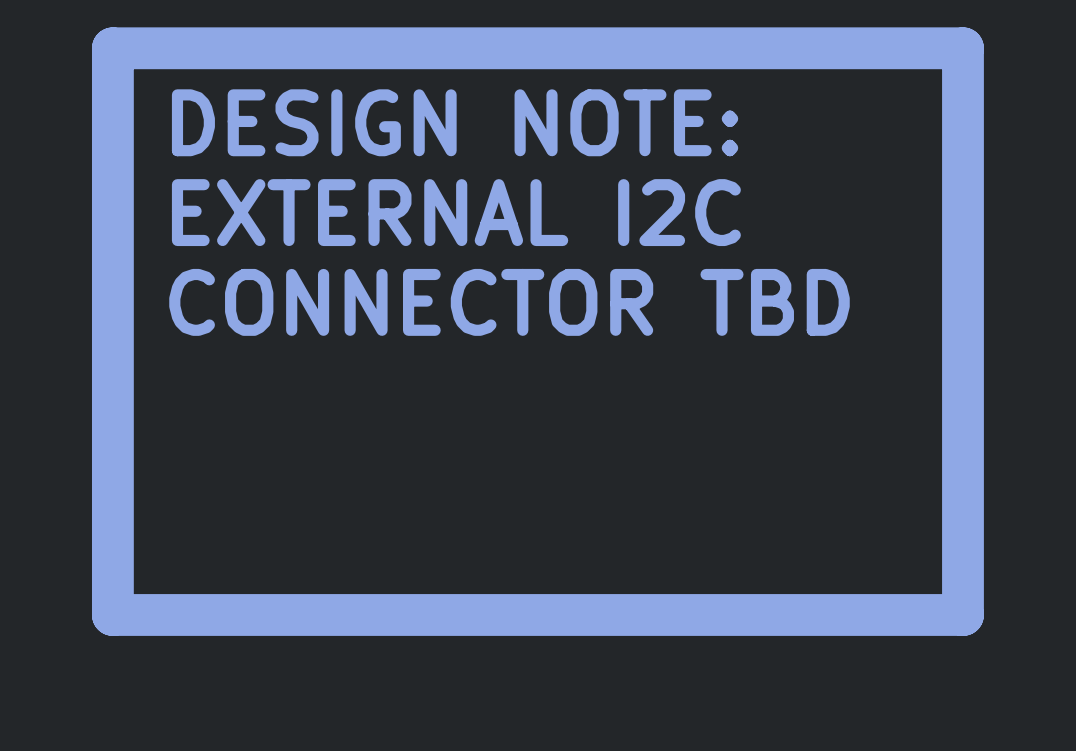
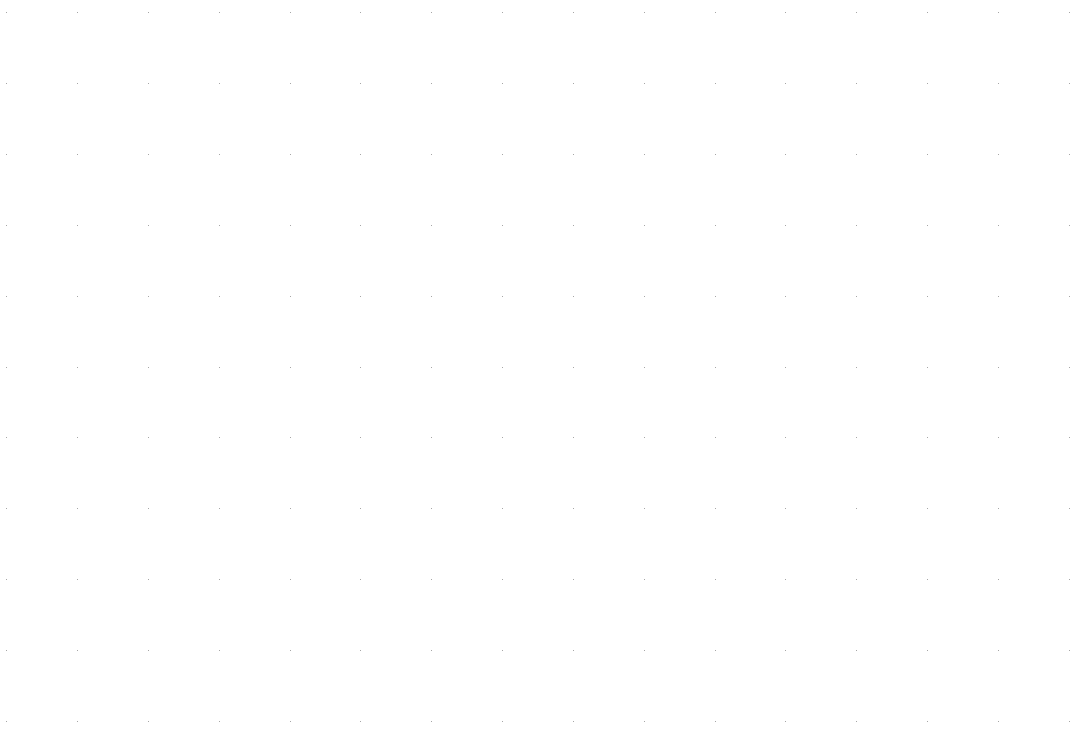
line: (112, 48) (962, 48) (962, 614) (112, 614) (112, 48) -> none
text: DESIGN NOTE: (455, 122) -> none
text: EXTERNAL I2C (456, 212) -> none
text: CONNECTOR TBD (509, 302) -> none

